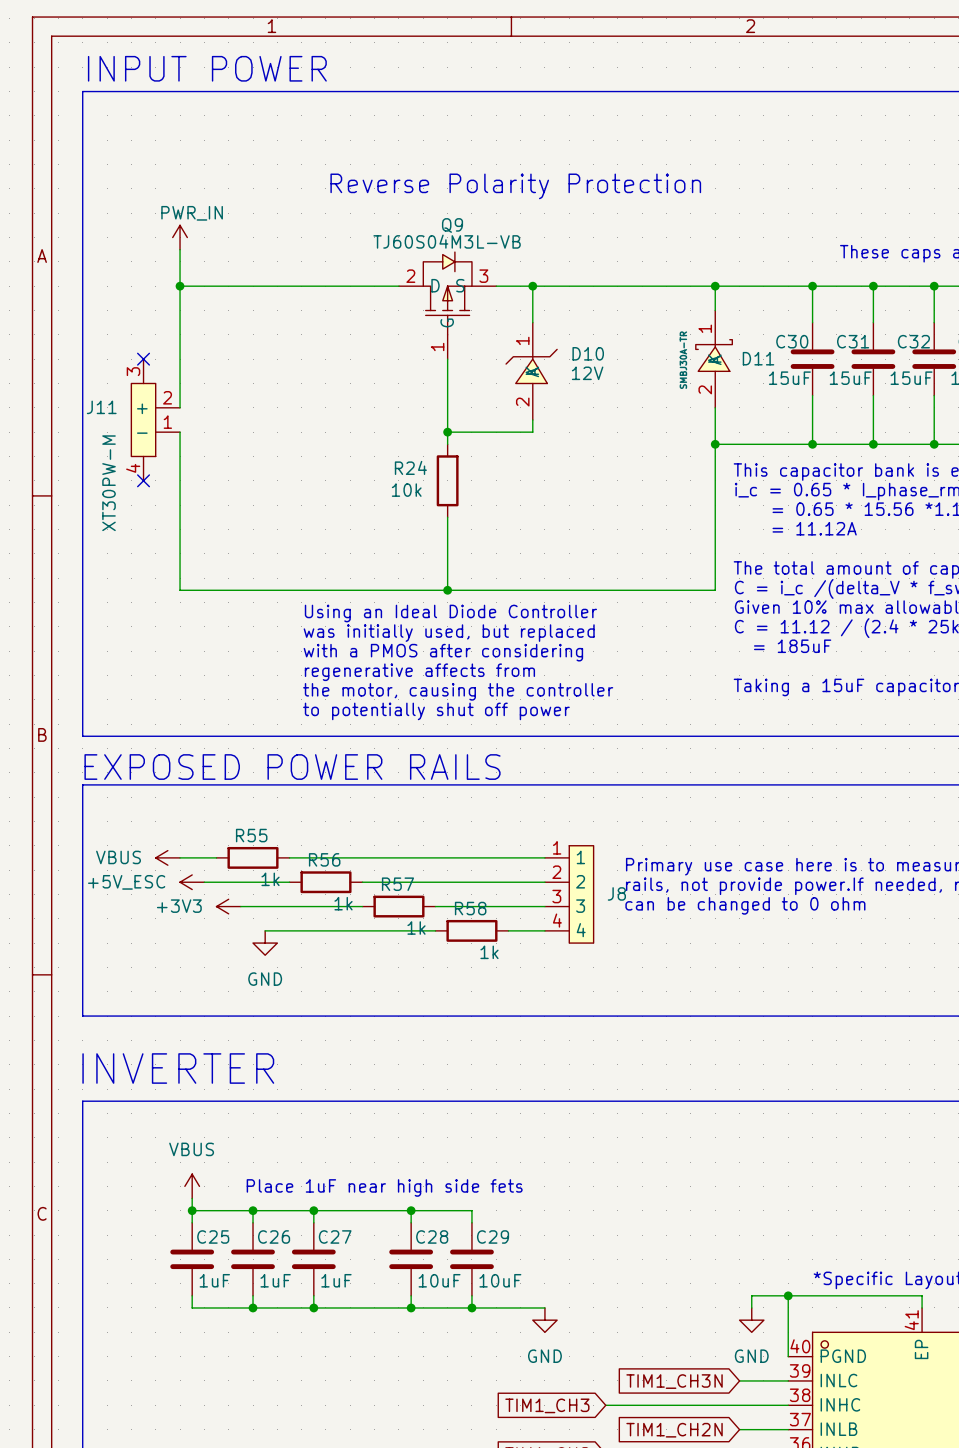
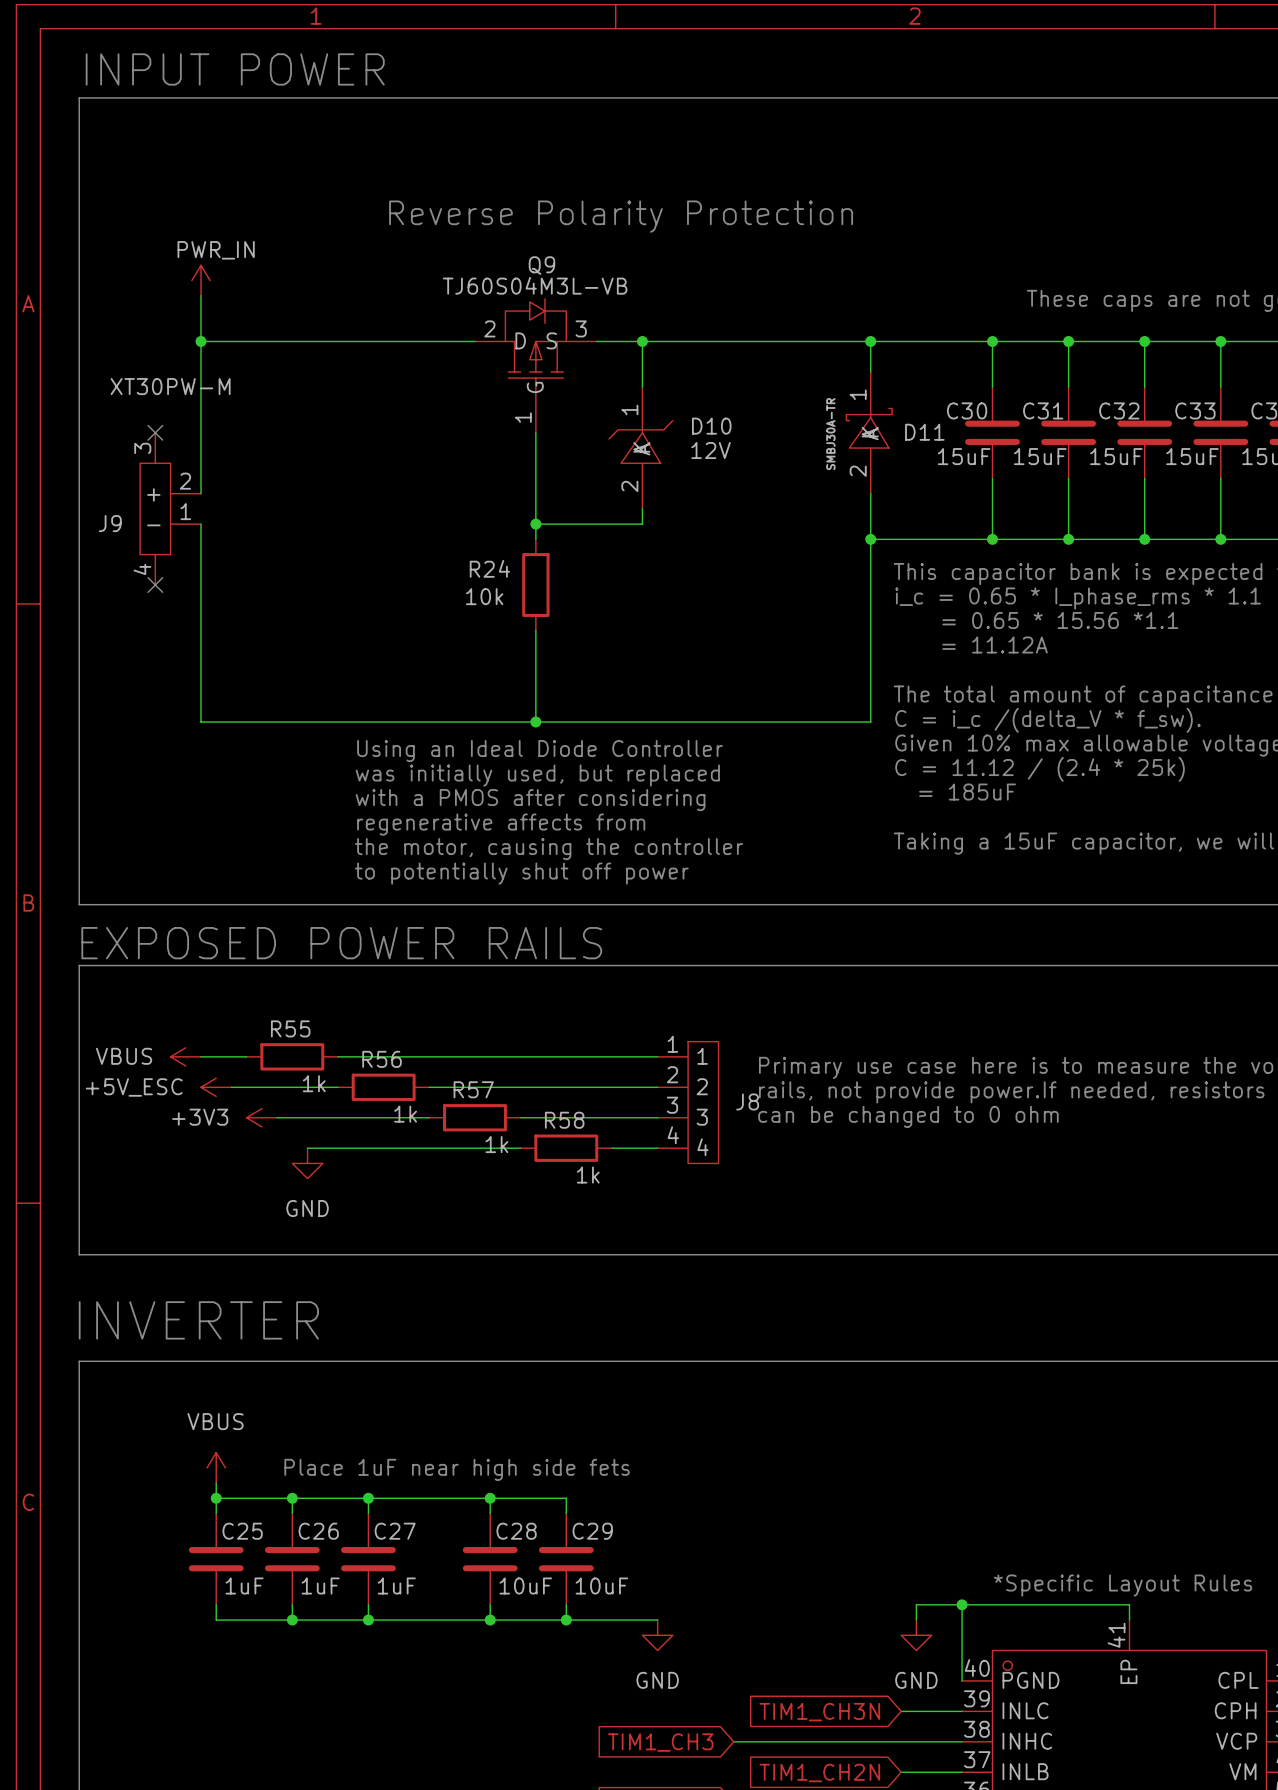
J11 name: J11 (101, 407) -> J9 (110, 523)
J11 value rotation: 0° (109, 483) -> 90° clockwise (170, 386)
J11 value position: XT30PW-M (109, 483) -> XT30PW-M (170, 386)

